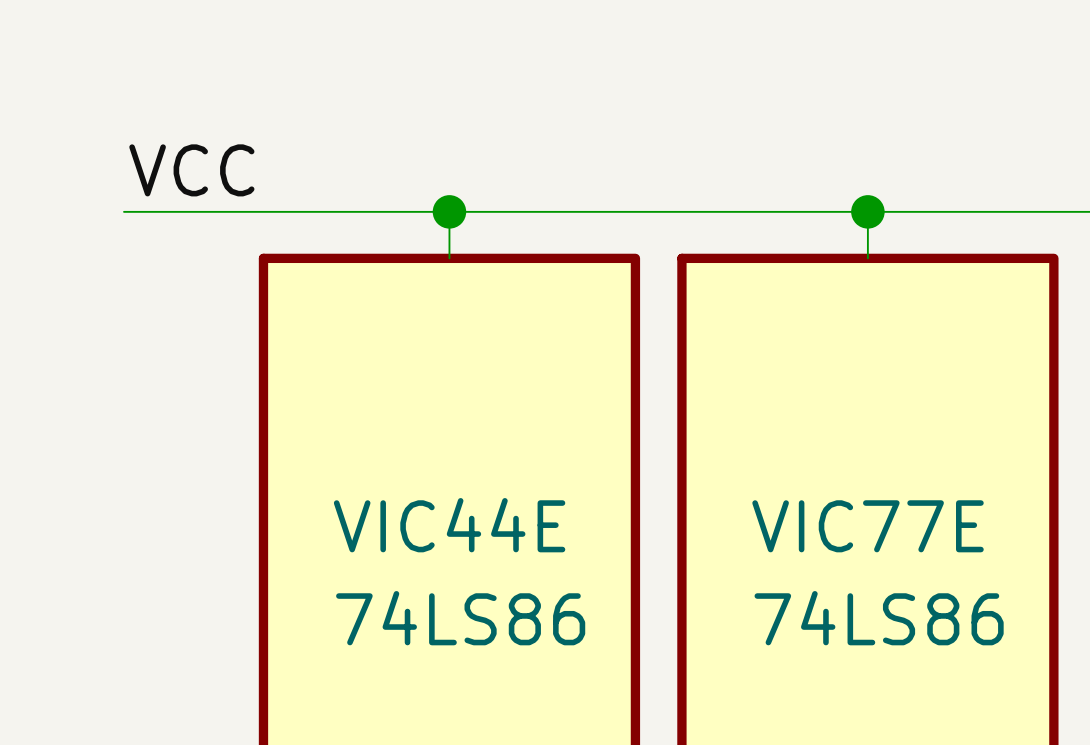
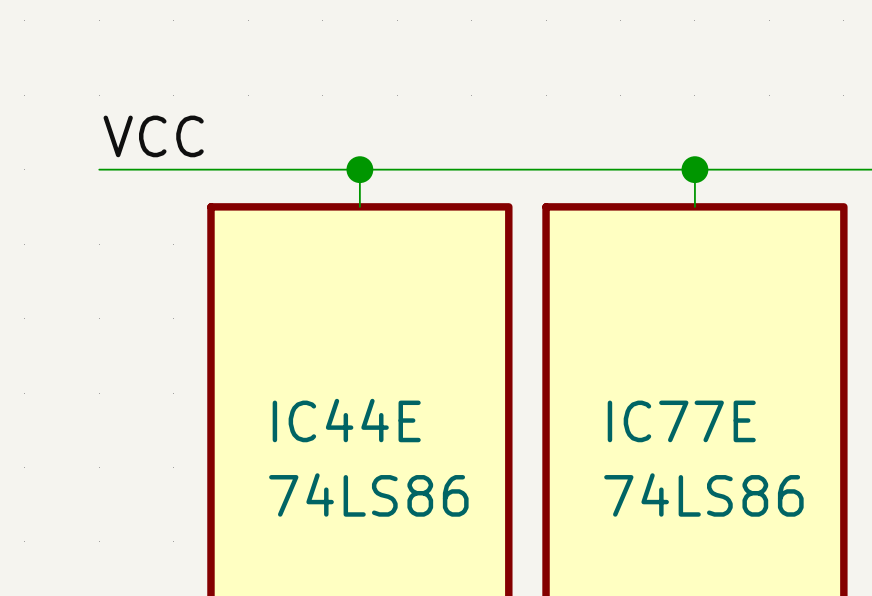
VIC44E name: VIC44E (449, 525) -> IC44E (346, 420)
VIC77E name: VIC77E (868, 526) -> IC77E (681, 421)

